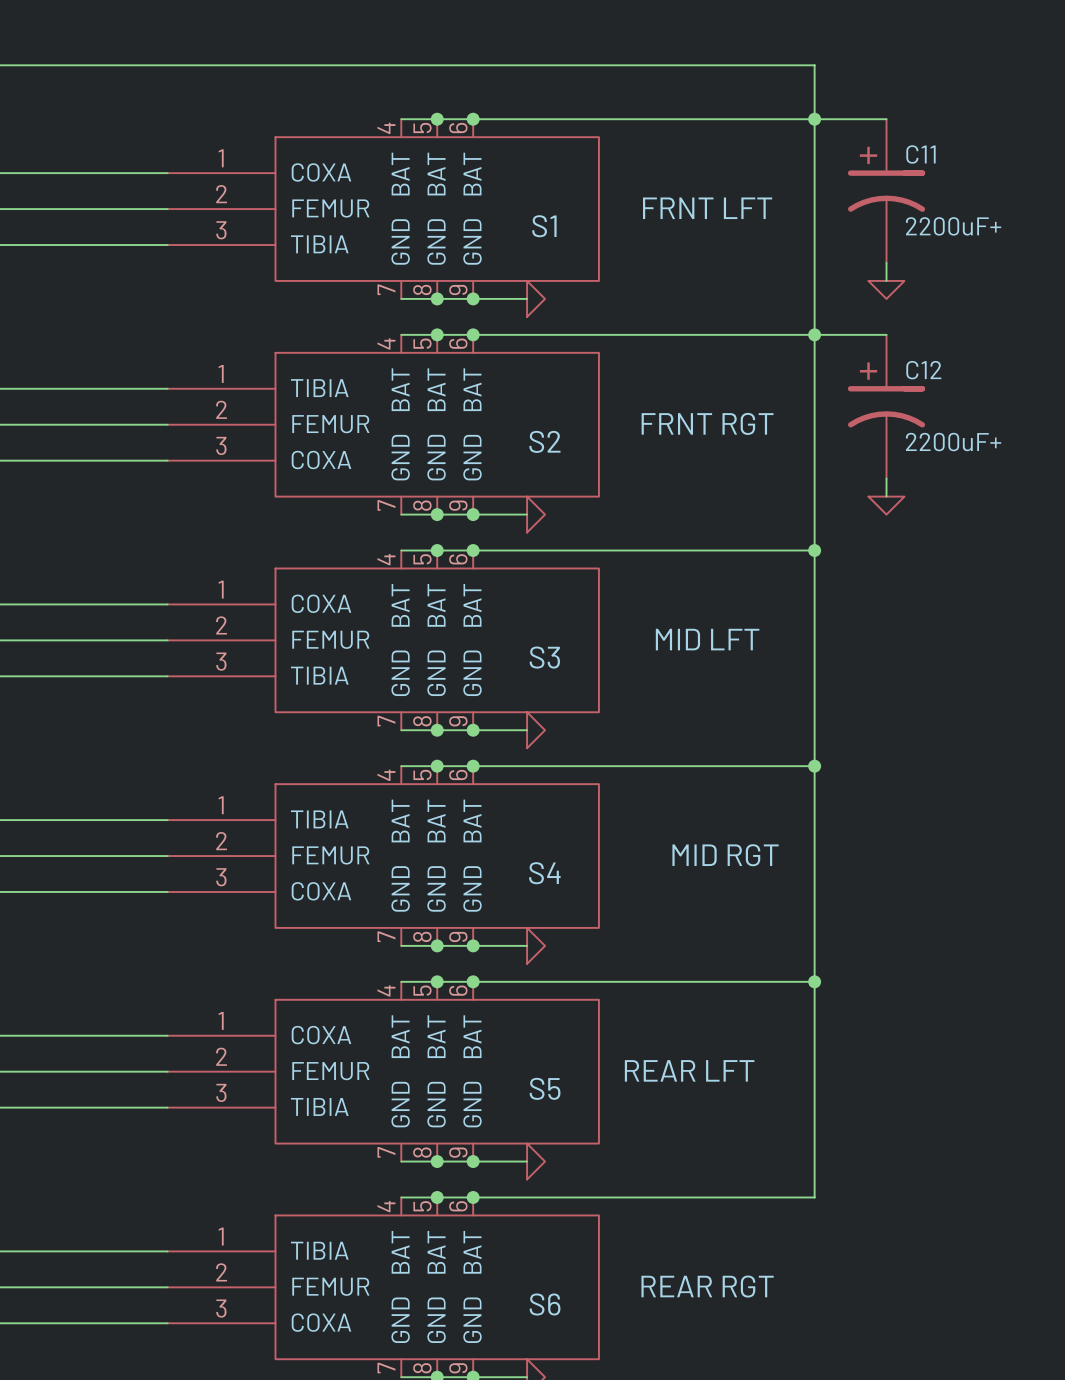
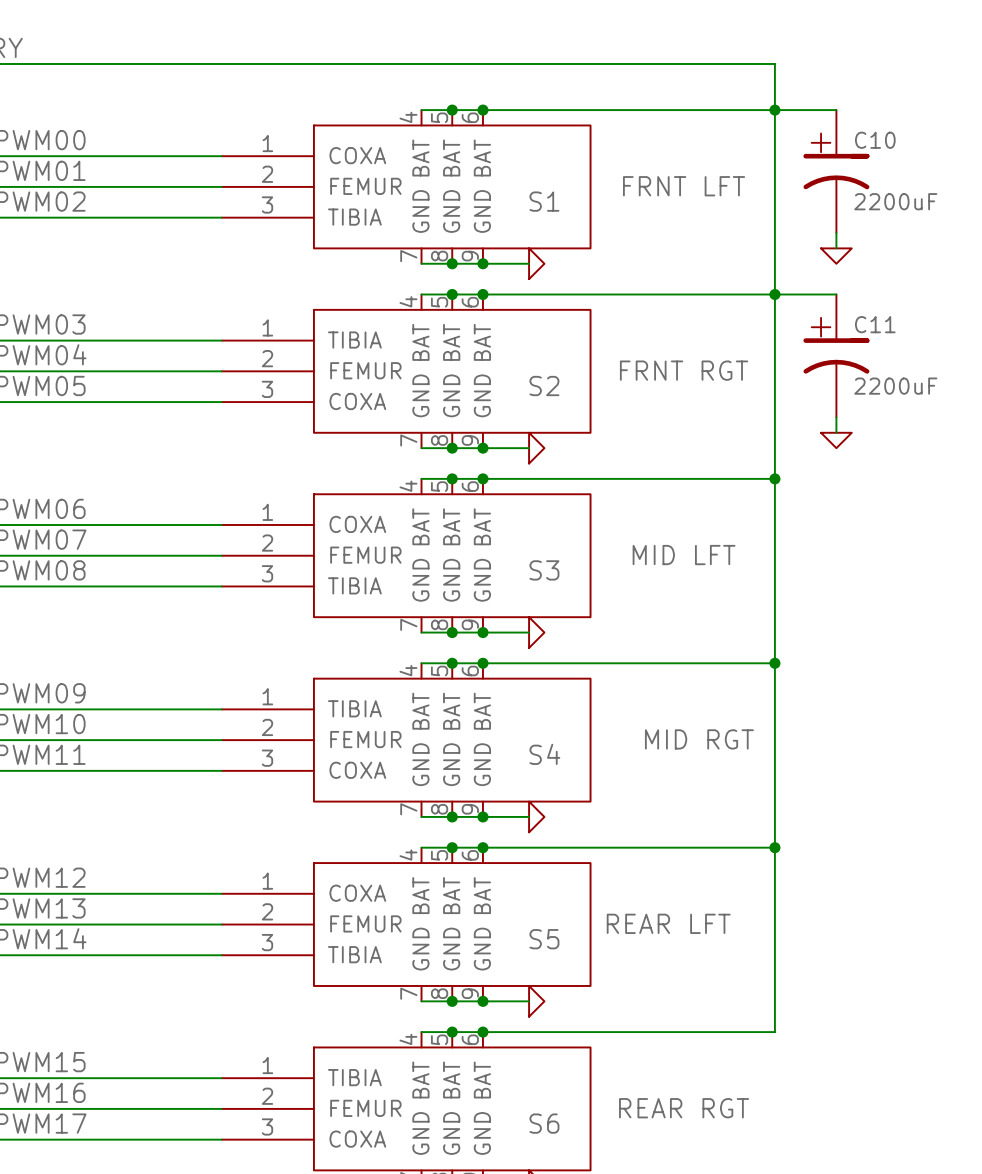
C11 name: C11 (920, 154) -> C10 (875, 140)
C11 value: 2200uF+ (953, 226) -> 2200uF (895, 201)
C12 name: C12 (923, 370) -> C11 (875, 324)
C12 value: 2200uF+ (953, 442) -> 2200uF (895, 386)

